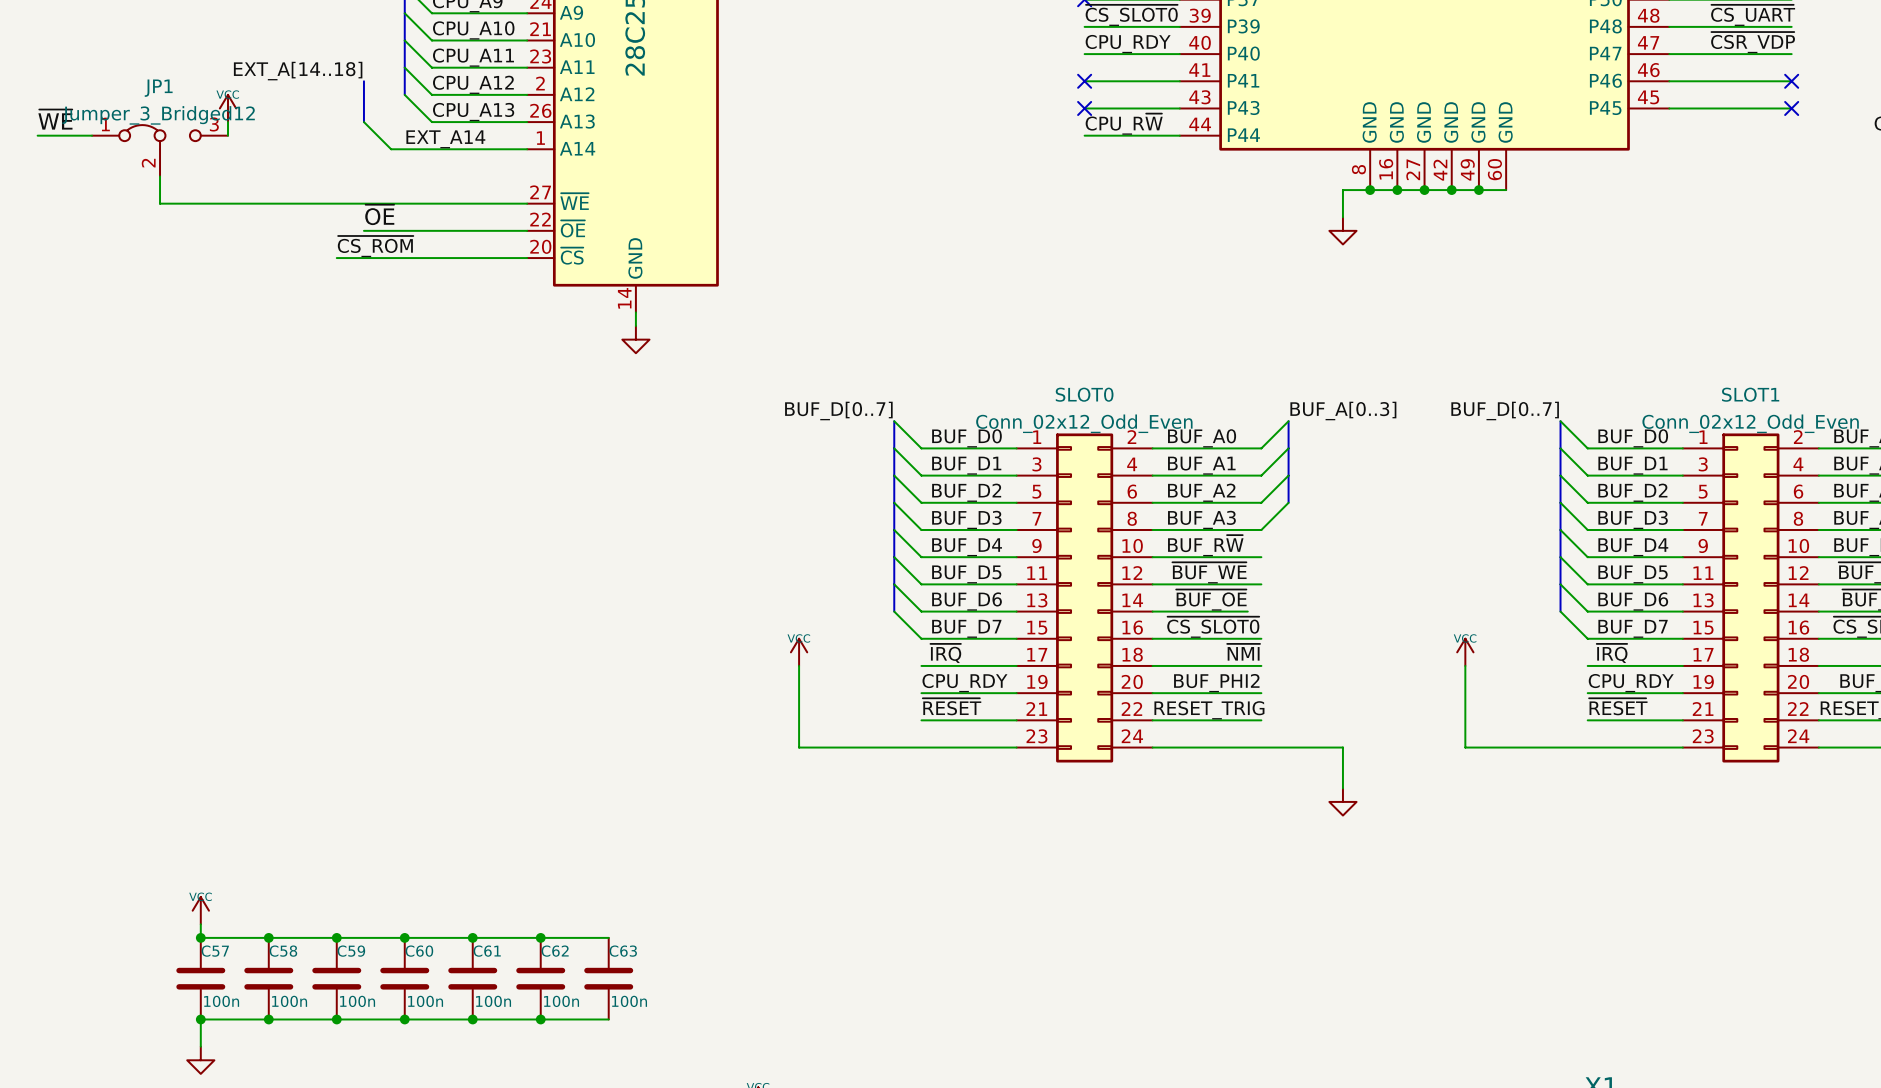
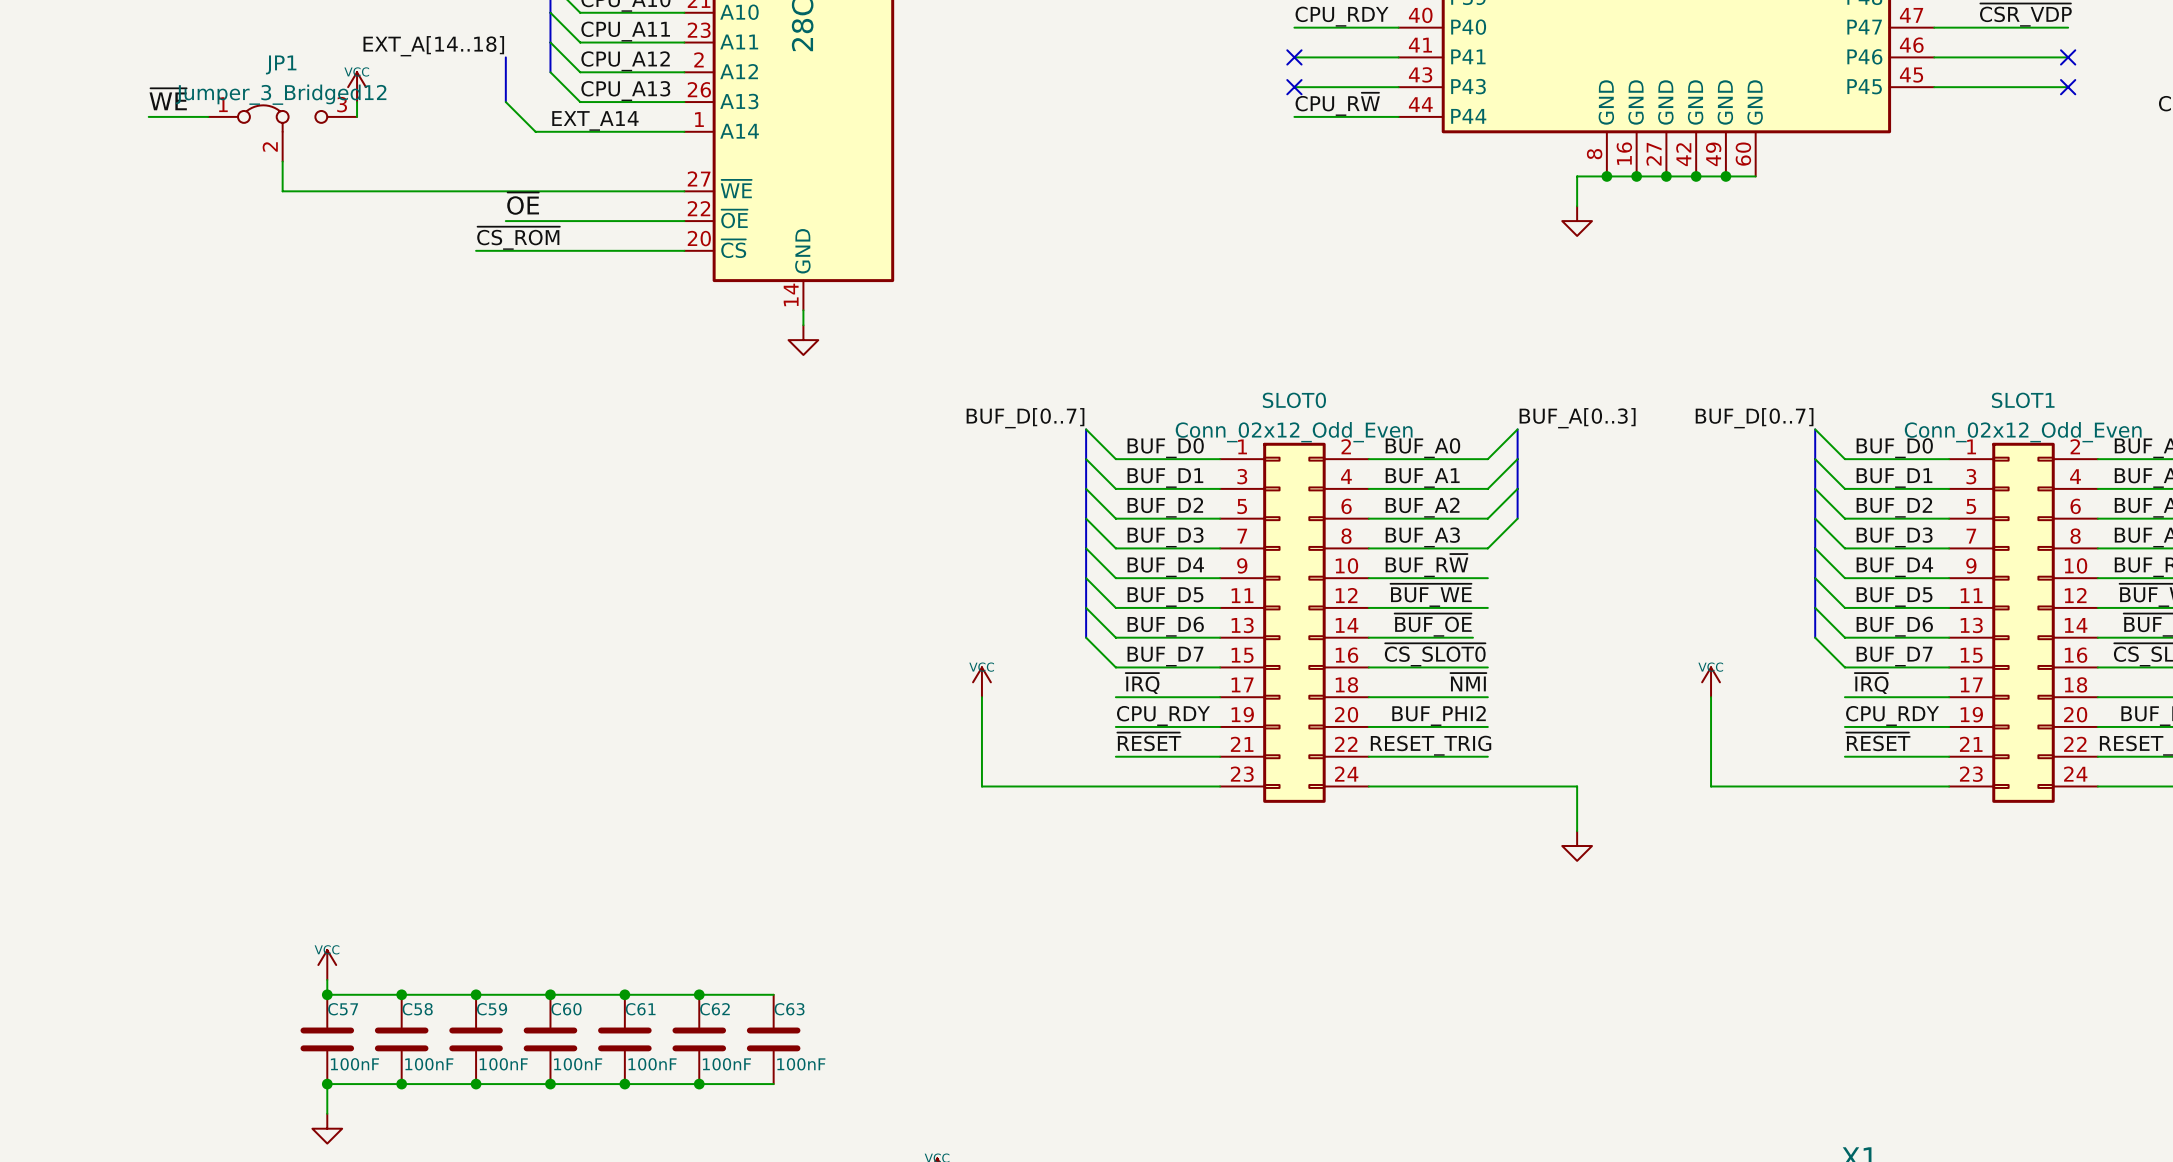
C57 value: 100n (221, 1001) -> 100nF (354, 1064)
C58 value: 100n (289, 1001) -> 100nF (429, 1064)
C59 value: 100n (357, 1001) -> 100nF (503, 1064)
C60 value: 100n (425, 1001) -> 100nF (578, 1064)
C61 value: 100n (493, 1001) -> 100nF (652, 1064)
C62 value: 100n (561, 1001) -> 100nF (726, 1064)
C63 value: 100n (629, 1001) -> 100nF (801, 1064)

